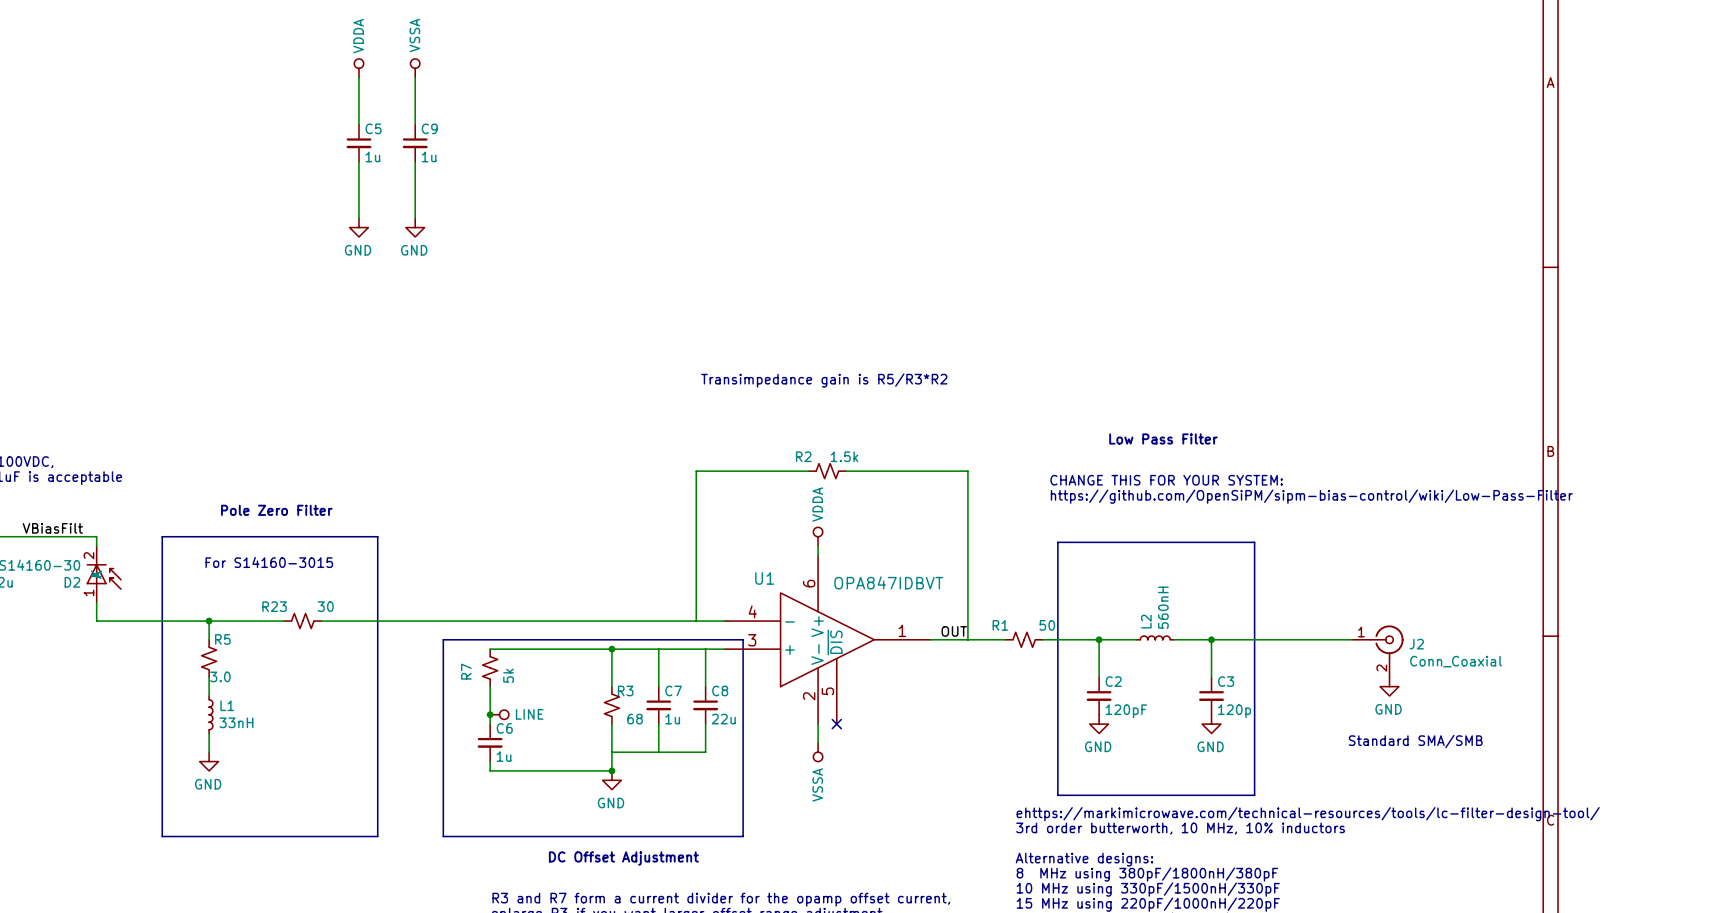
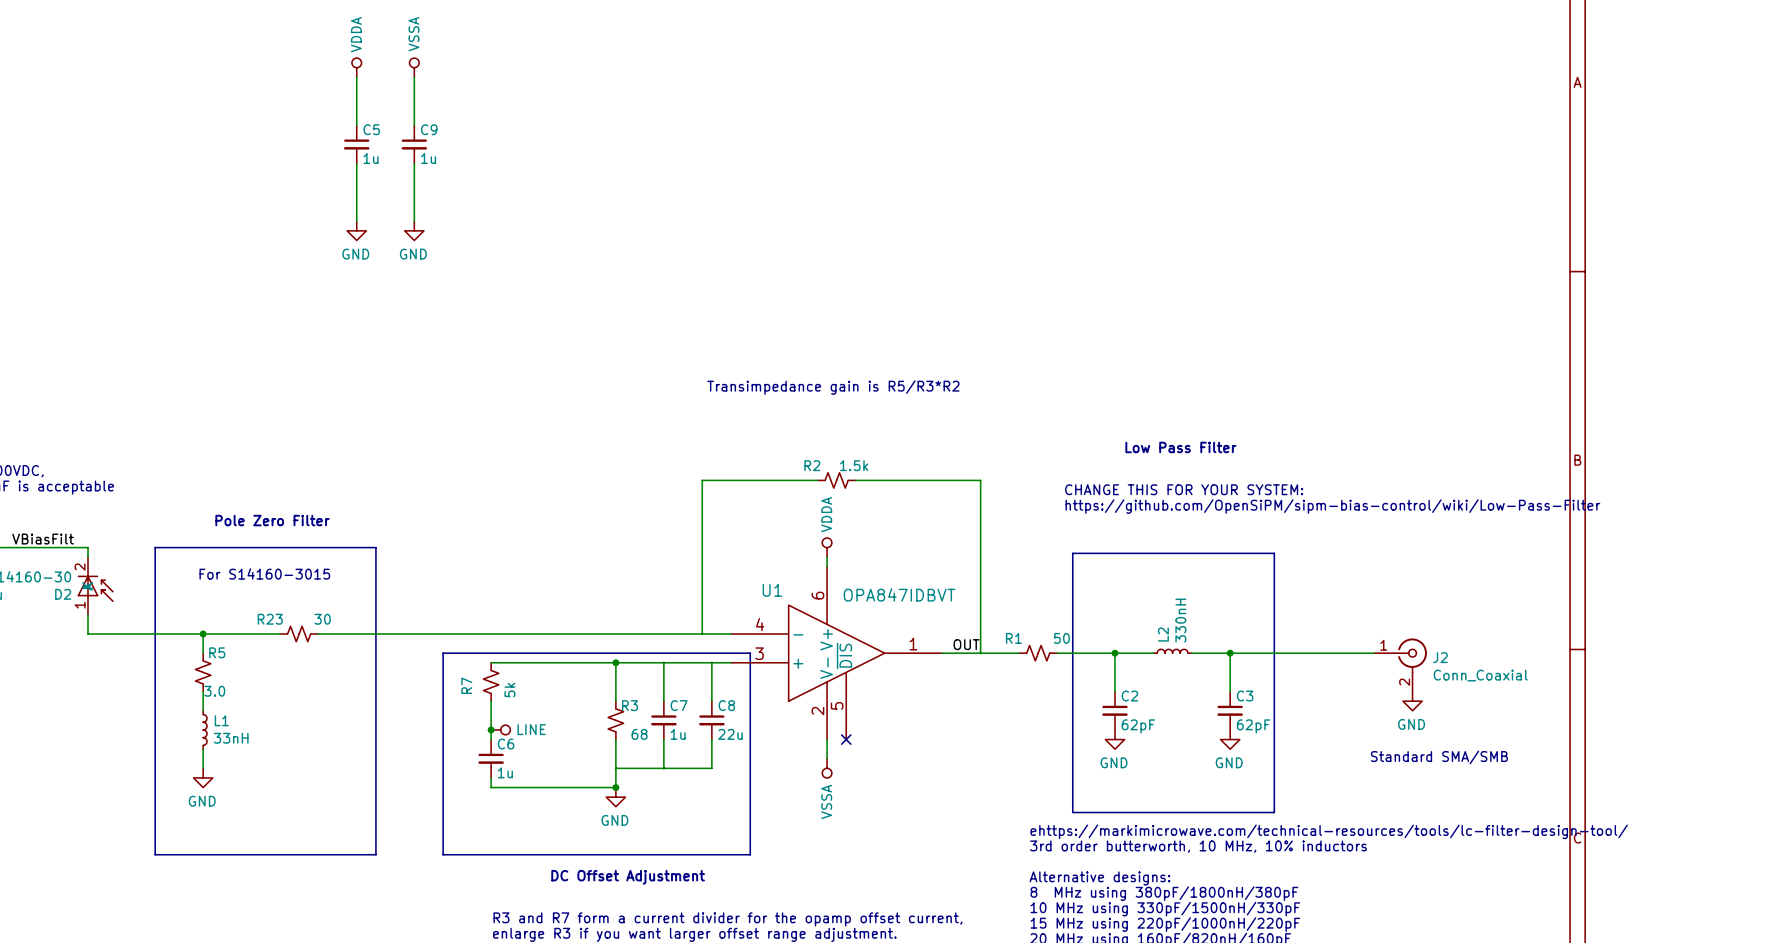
L2 value: 560nH (1163, 607) -> 330nH (1180, 620)
C2 value: 120pF (1126, 711) -> 62pF (1138, 726)
C3 value: 120p (1234, 711) -> 62pF (1253, 726)

